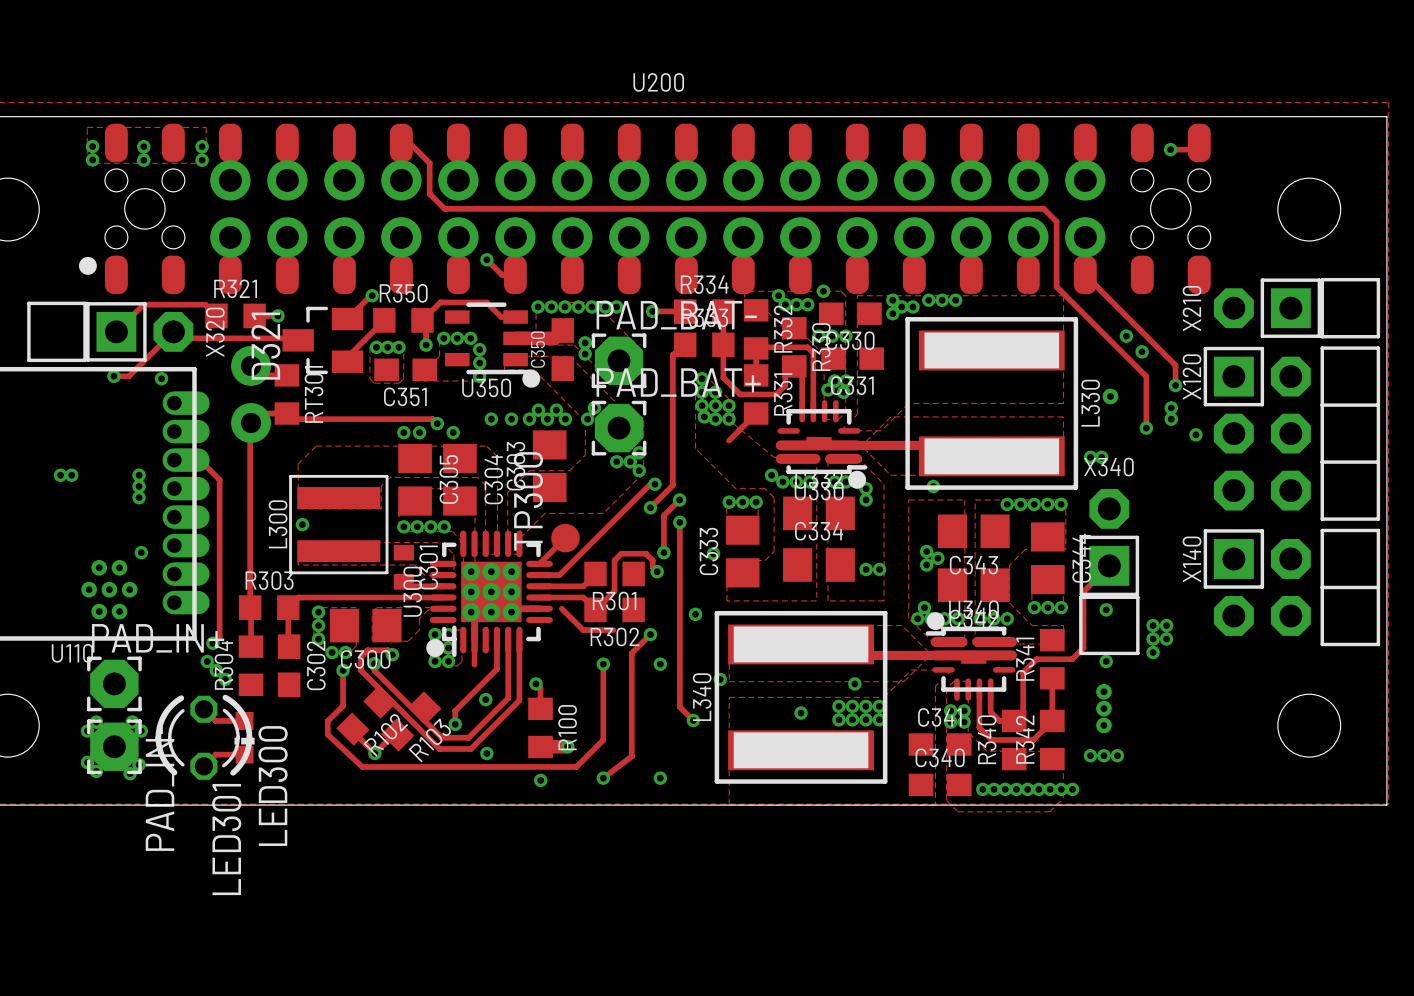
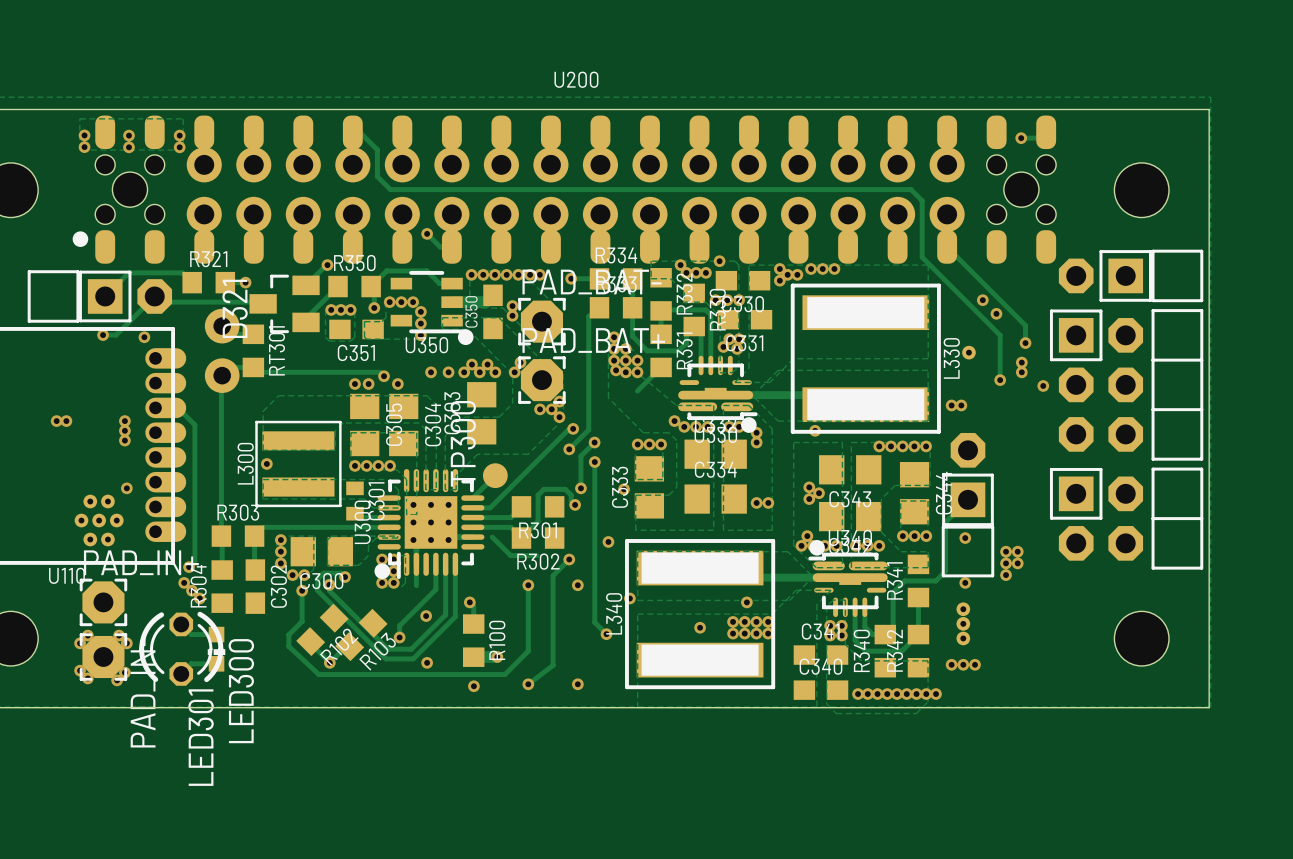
X210 name: X210 (1192, 308) -> none
X320 name: X320 (215, 332) -> none
X120 name: X120 (1192, 377) -> none
X340 name: X340 (1108, 467) -> none
X140 name: X140 (1192, 559) -> none

